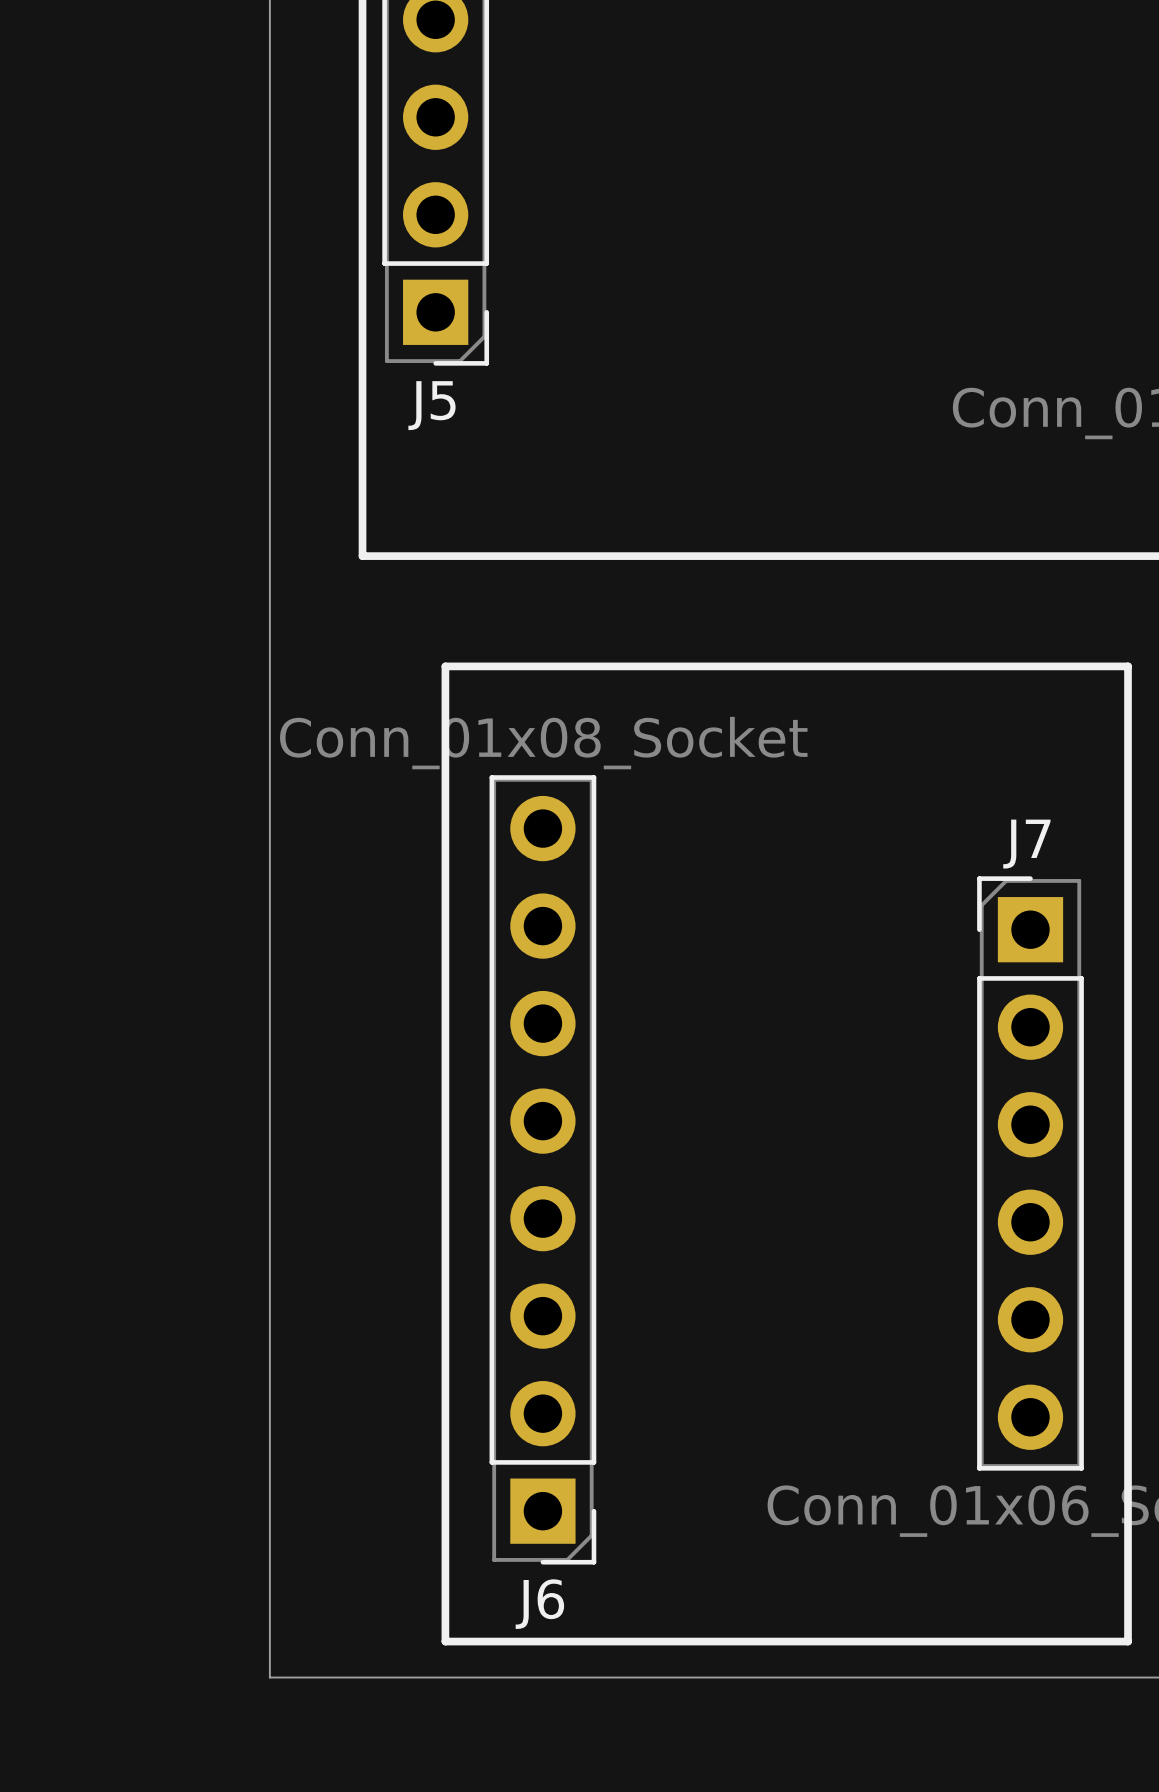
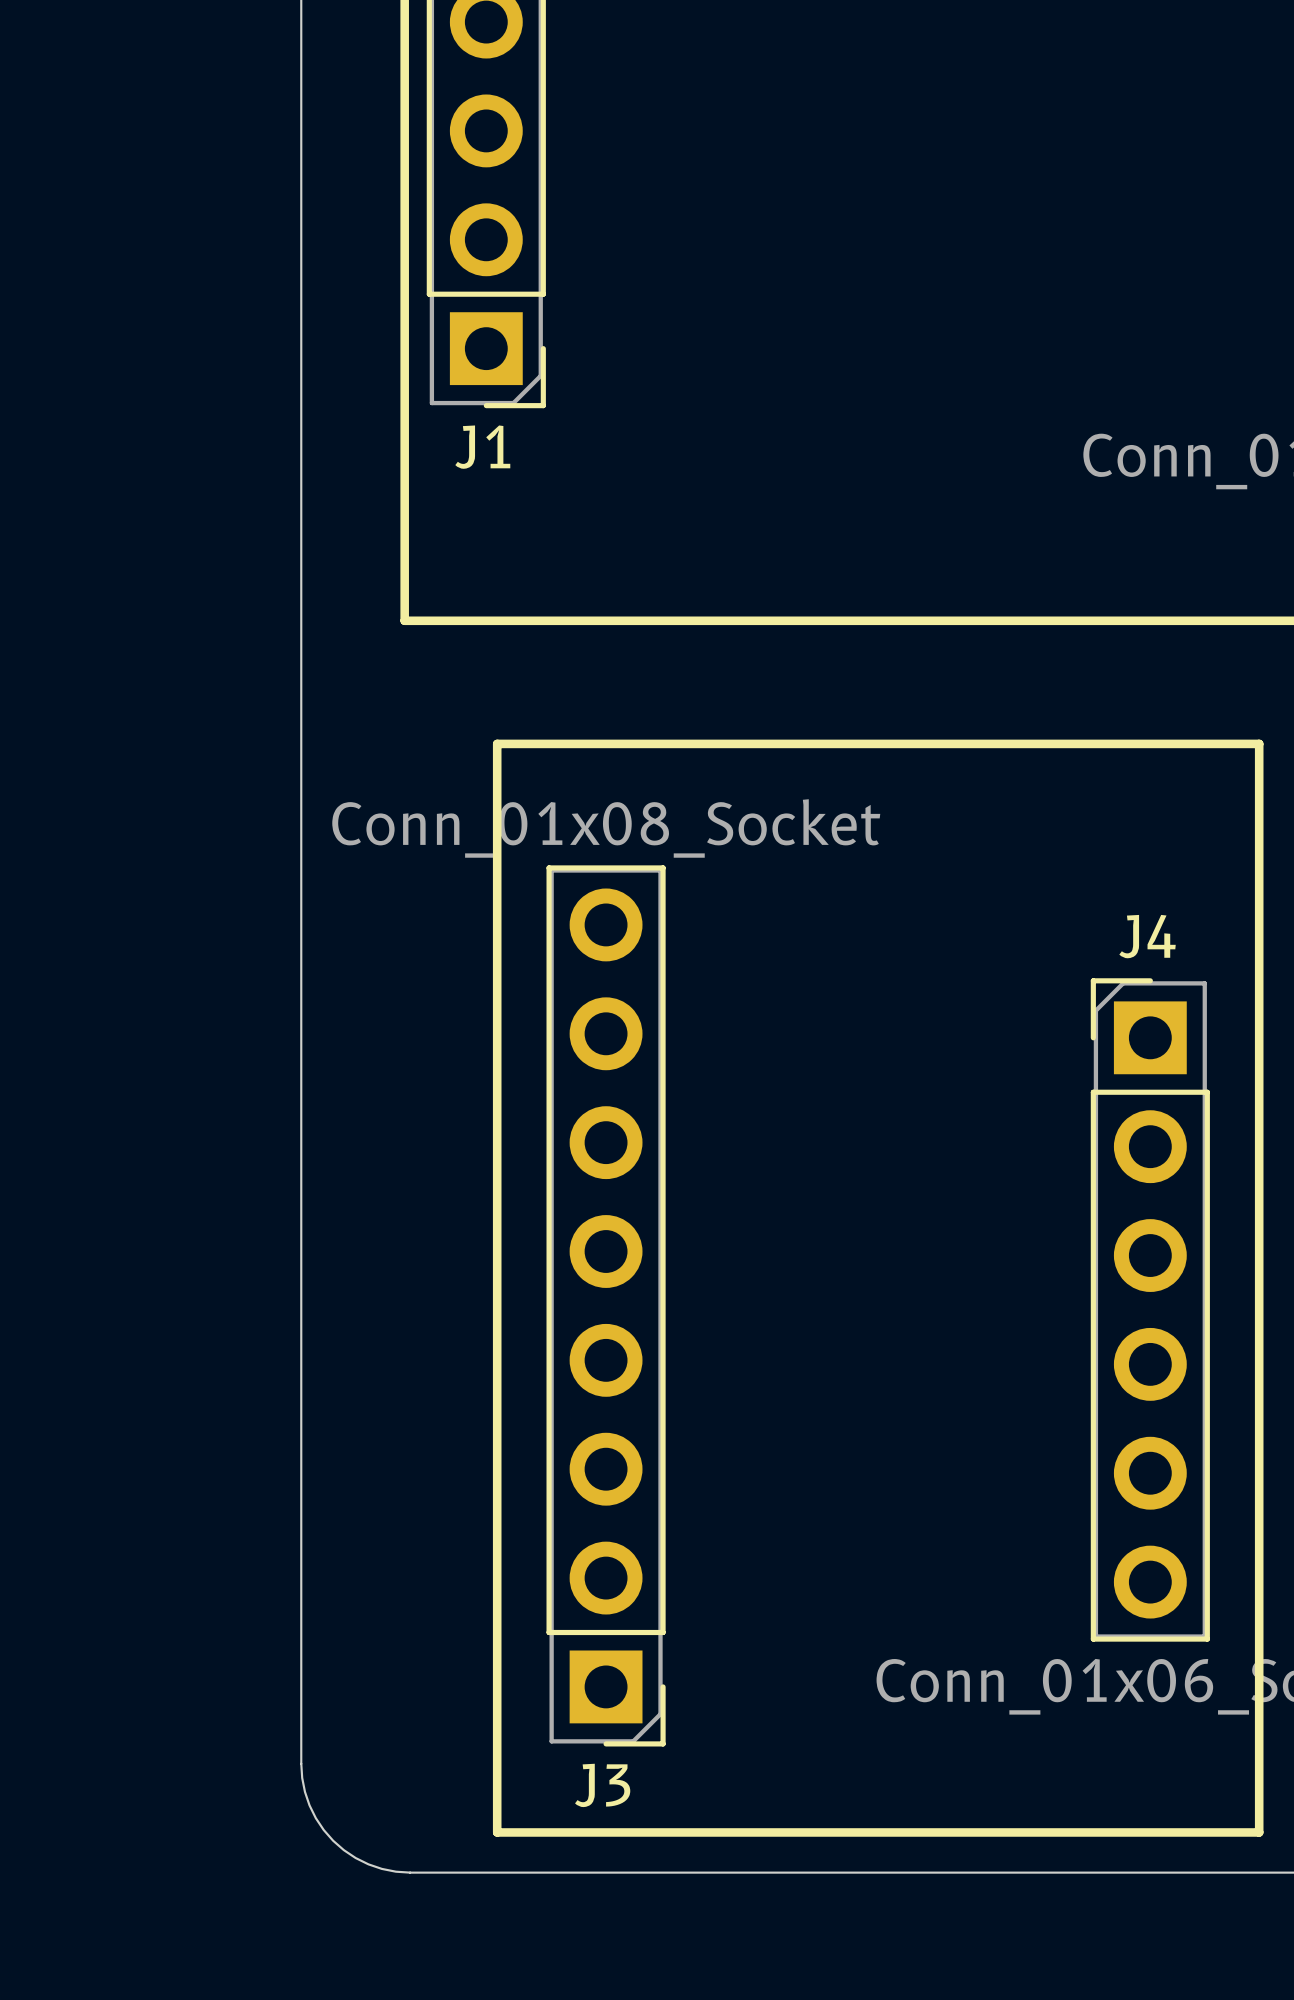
J5 name: J5 (431, 405) -> J1 (482, 447)
J7 name: J7 (1026, 844) -> J4 (1147, 936)
board edge: (269, 1580) (269, 1677) (367, 1677) -> (301, 1763) (304, 1791) (309, 1805) (323, 1830) (333, 1840) (343, 1850) (368, 1864) (381, 1868) (410, 1872)
J6 name: J6 (539, 1604) -> J3 (602, 1785)

